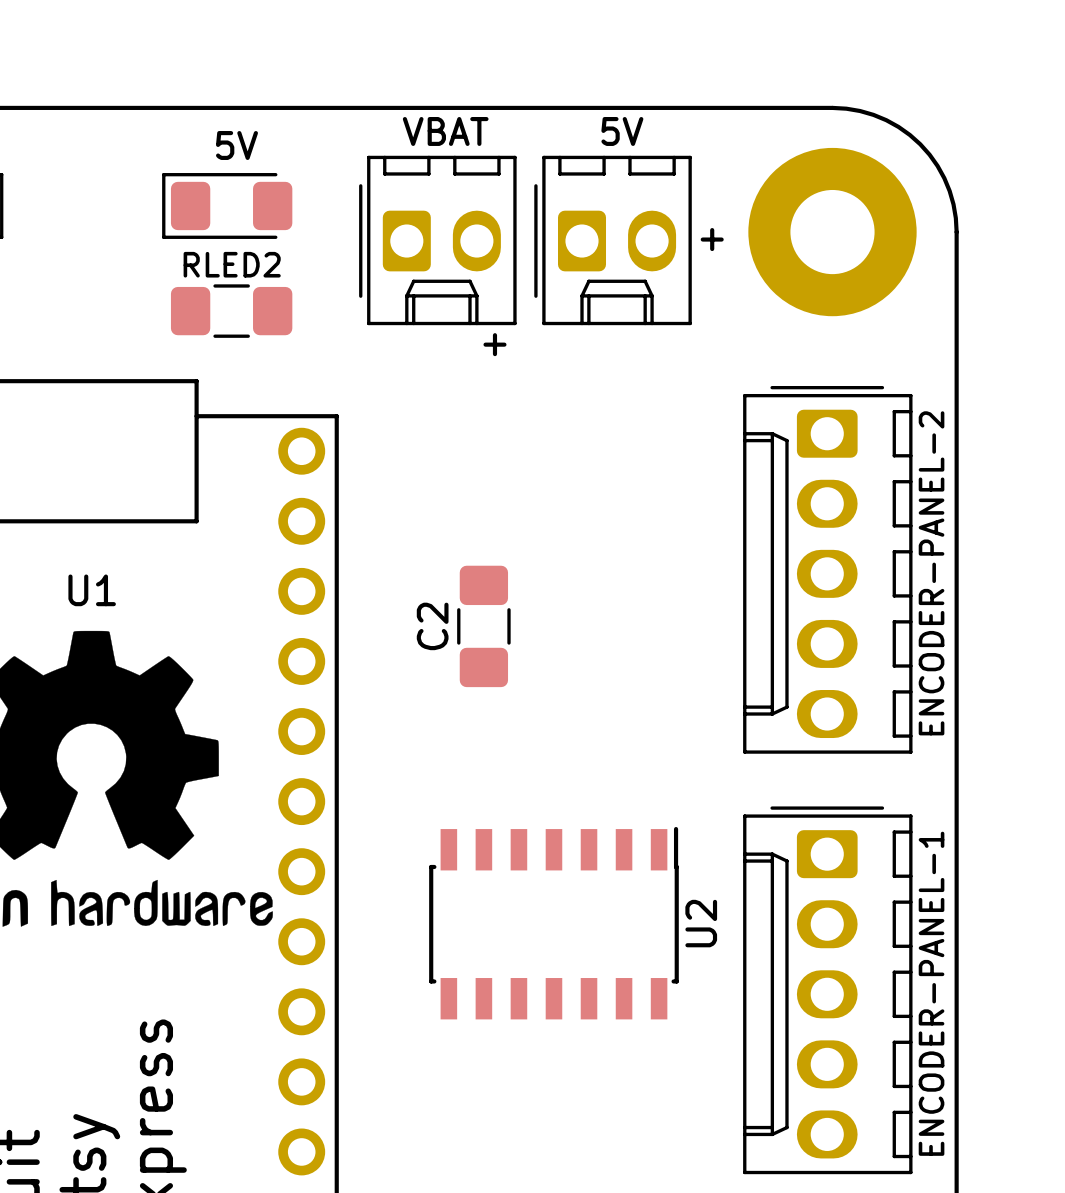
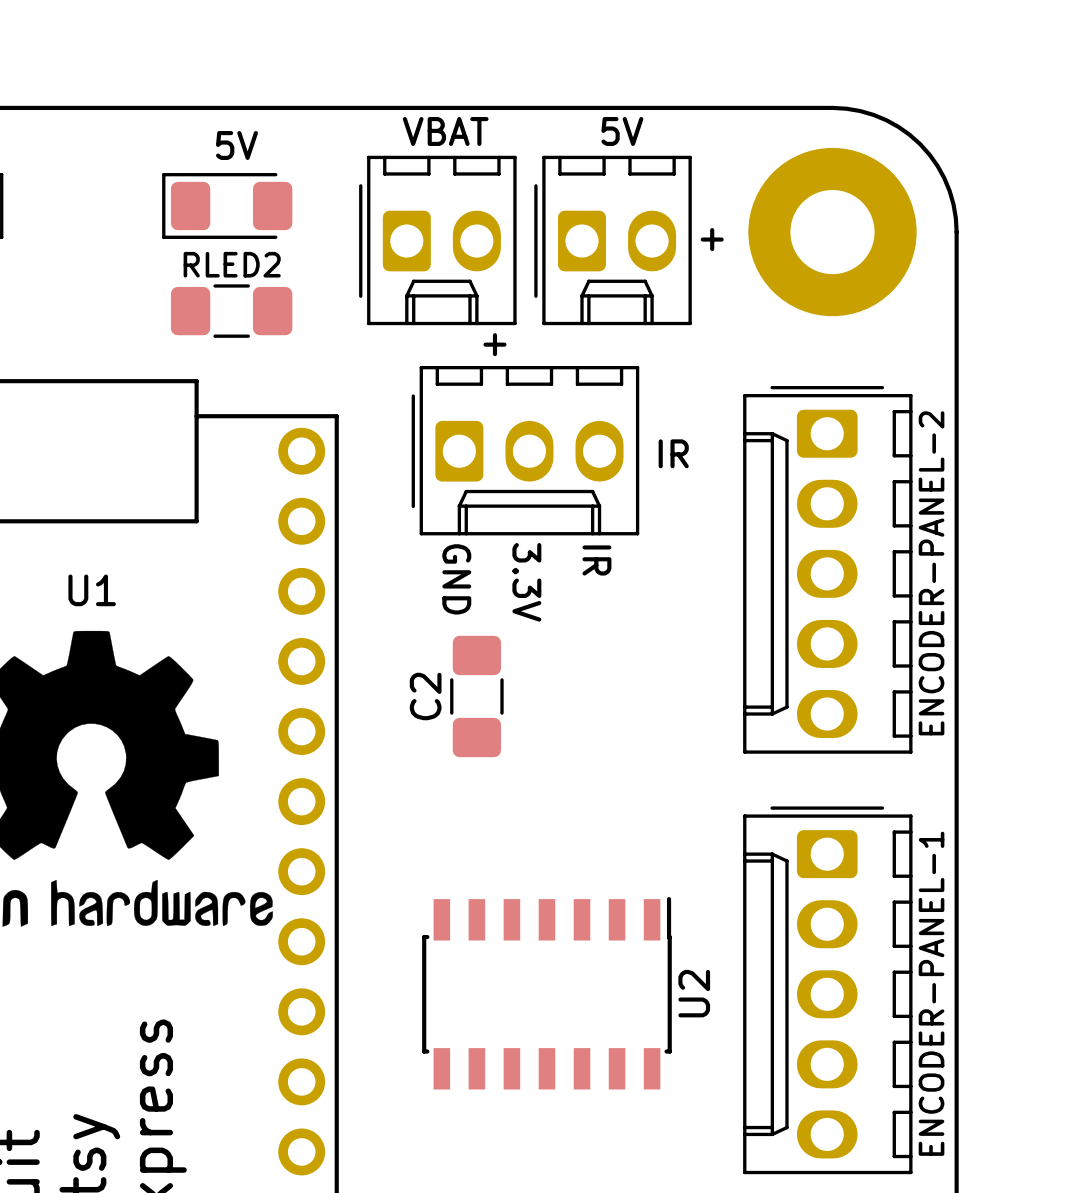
part: none -> (525, 450)
text: none -> IR (673, 453)
text: none -> IR (596, 560)
text: none -> GND (456, 579)
text: none -> 3.3V (526, 582)
C2 position: (483, 626) -> (476, 696)
U2 position: (553, 923) -> (546, 993)

